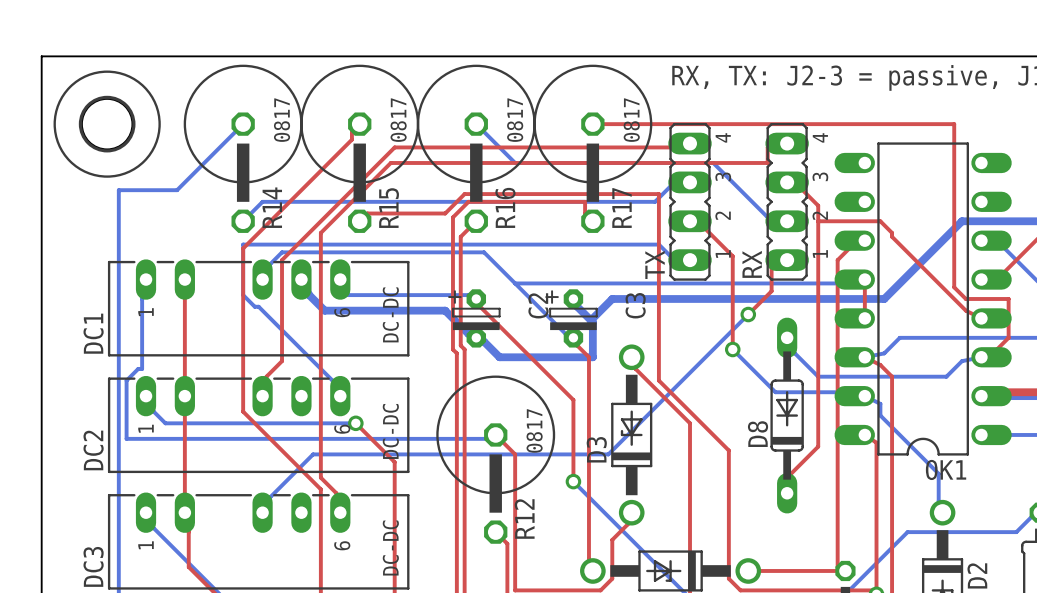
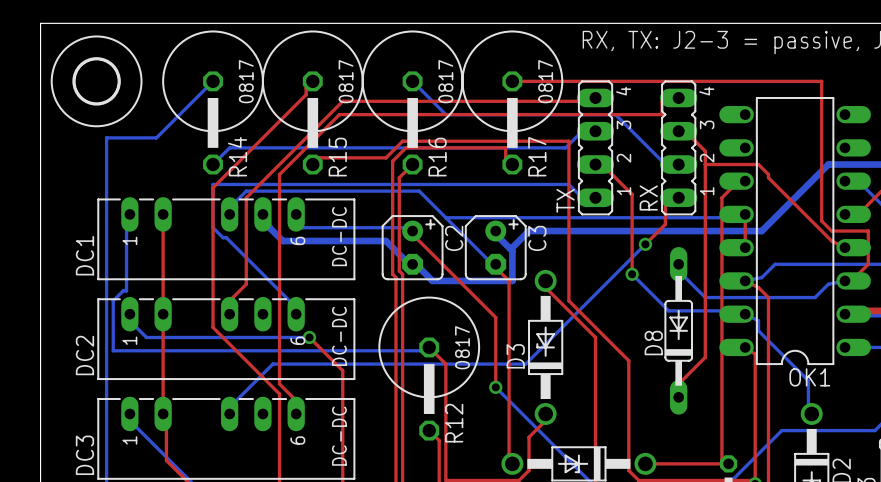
C2 footprint: [448, 289, 501, 348] -> [381, 215, 444, 281]
C3 footprint: [545, 289, 598, 348] -> [464, 215, 527, 281]

